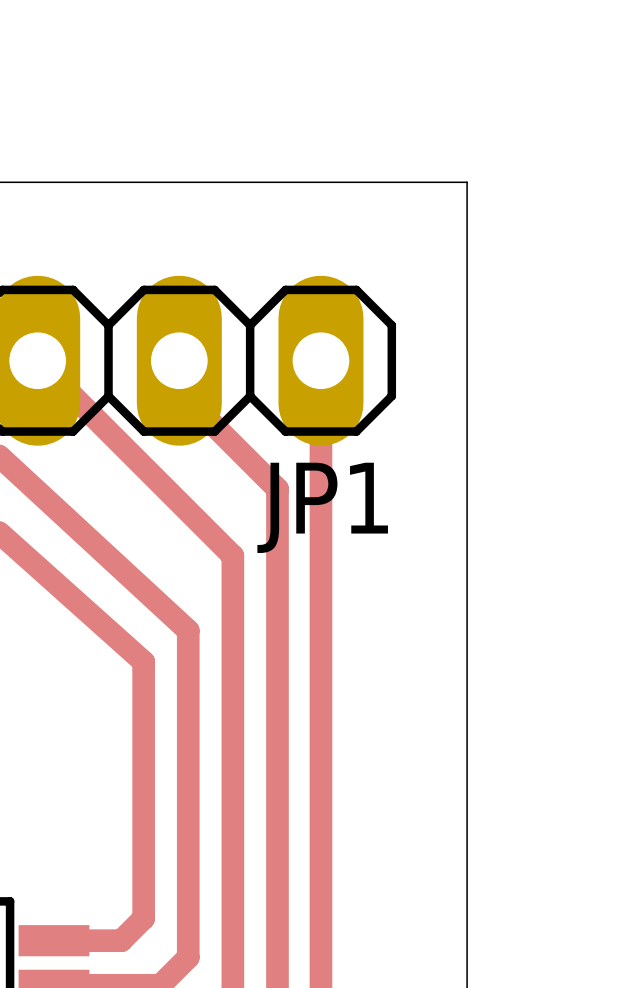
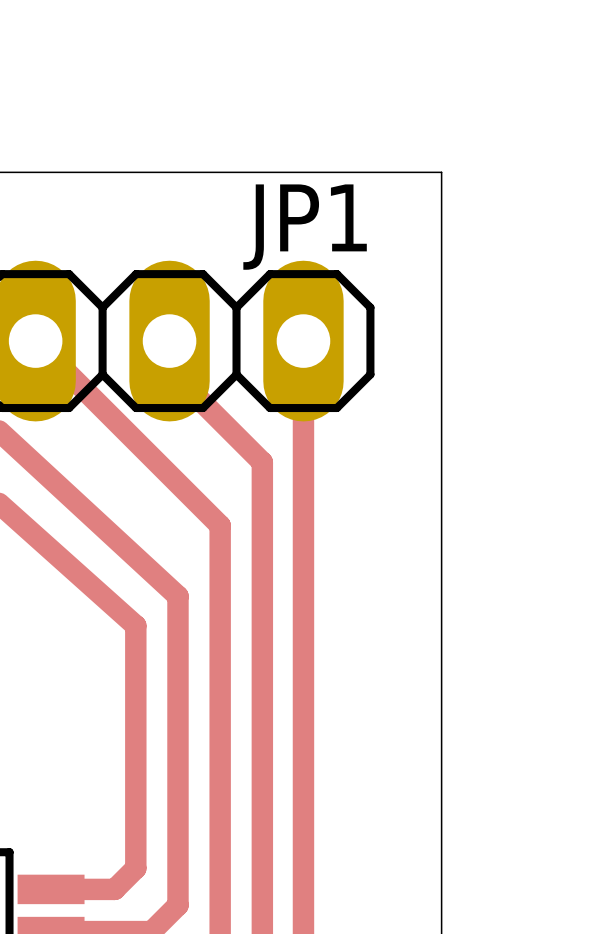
JP1 name position: JP1 (322, 507) -> JP1 (305, 227)

